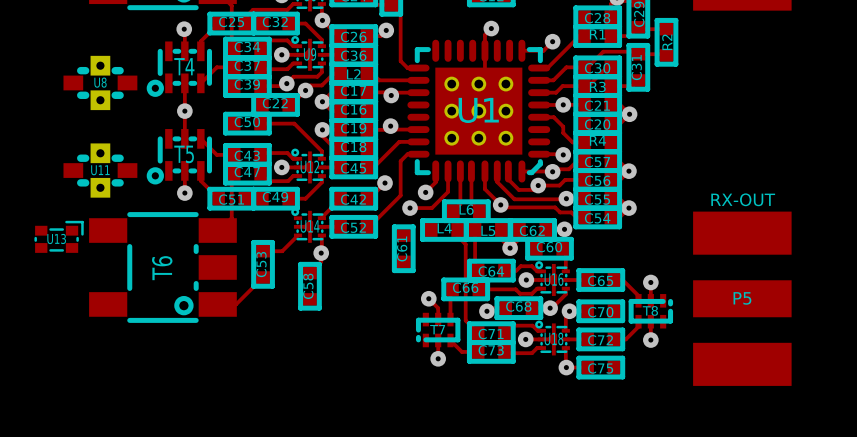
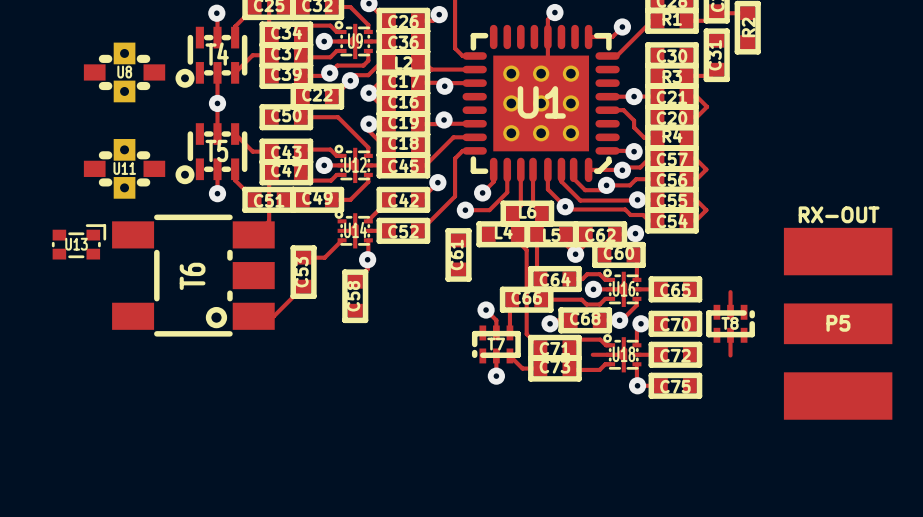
track: (666, 55) (638, 54) (635, 51) (603, 51) (587, 67) (566, 67) (553, 80) (539, 80) -> none
track: (610, 67) (607, 67) (588, 86) (562, 86) (556, 92) (539, 92) -> none
via: (629, 114) -> none
via: (628, 171) -> none
via: (628, 208) -> none
track: (613, 280) (622, 280) (638, 295) (638, 300) -> none
via: (650, 282) -> none
P5 position: (742, 298) -> (838, 323)
track: (638, 321) (638, 326) (625, 339) (613, 339) -> none
via: (525, 339) -> none
via: (650, 340) -> none

